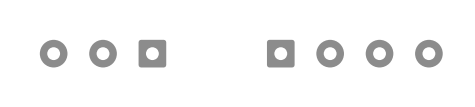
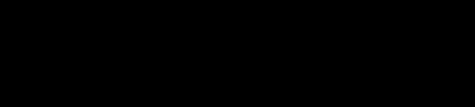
part: (103, 53) -> none
part: (354, 53) -> none

